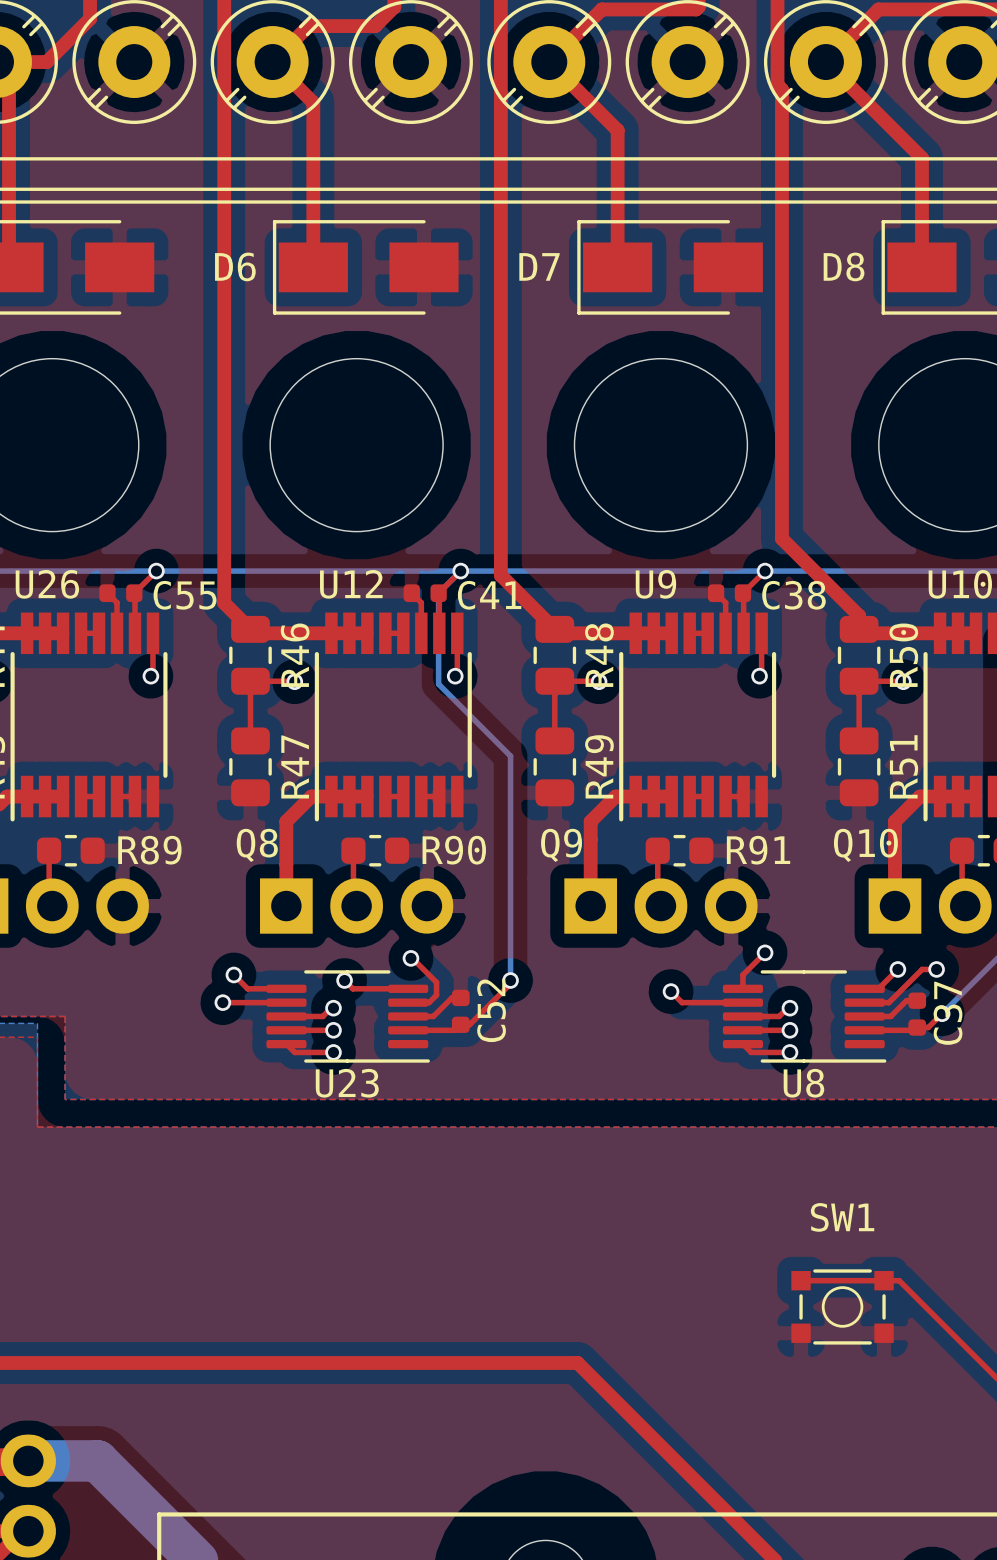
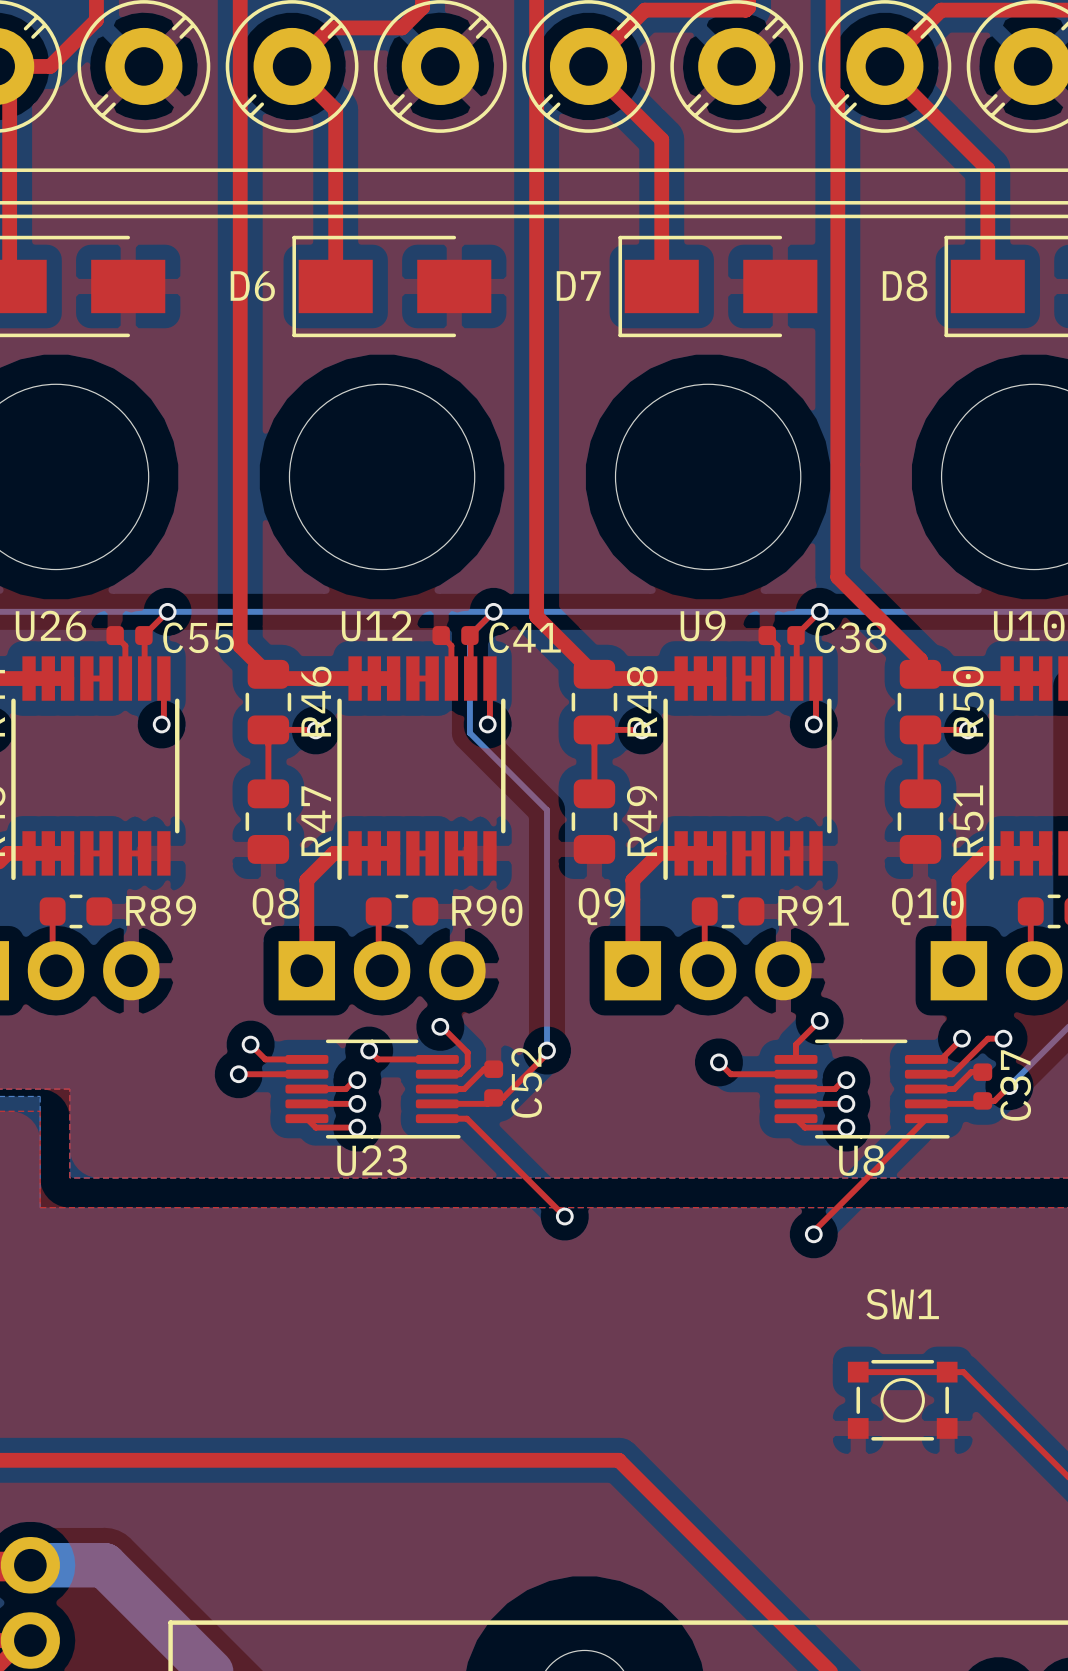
top track: none -> (437, 1118) (466, 1118) (564, 1216)
top track: none -> (926, 1118) (813, 1231) (813, 1234)
via: none -> (564, 1216)
via: none -> (813, 1234)

